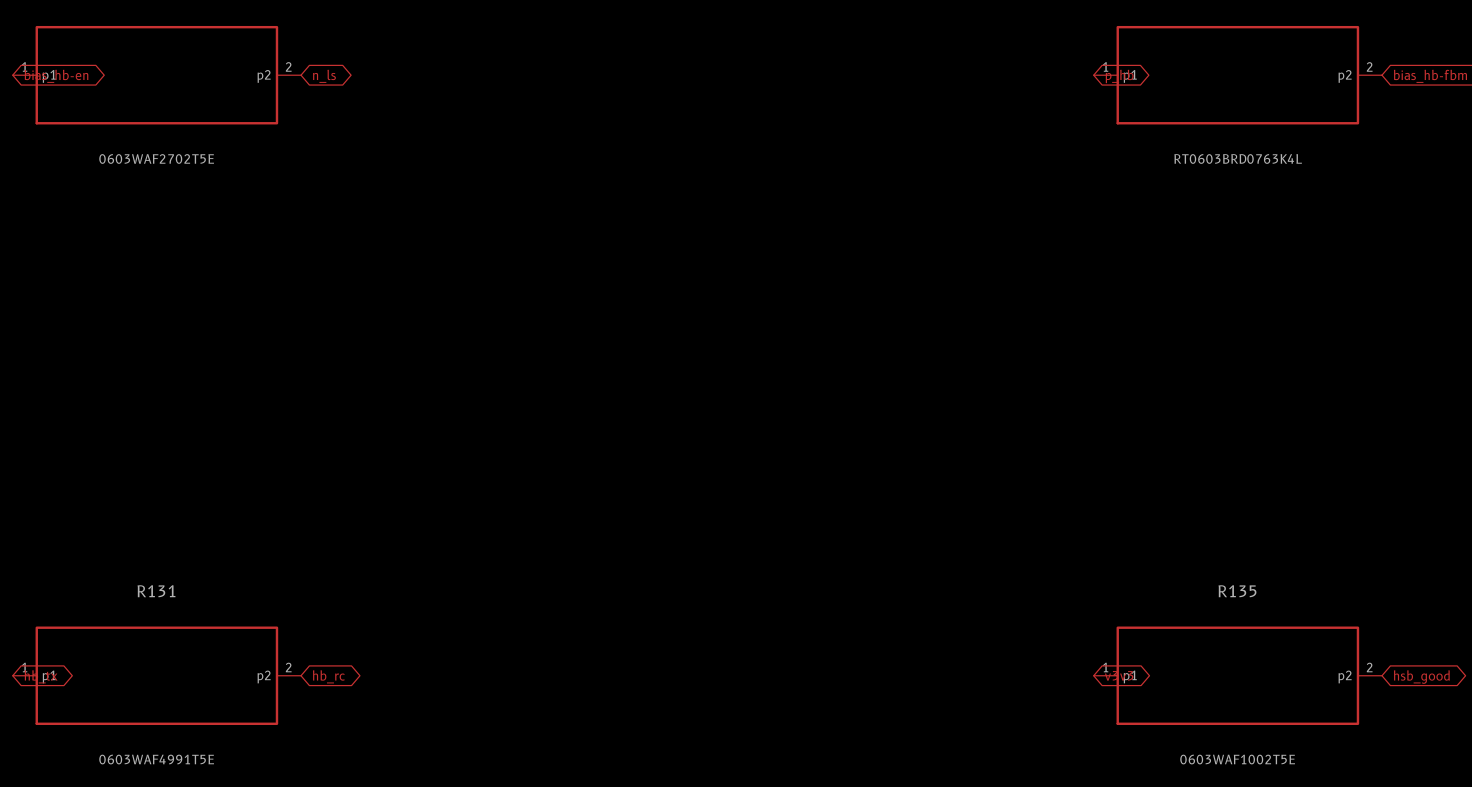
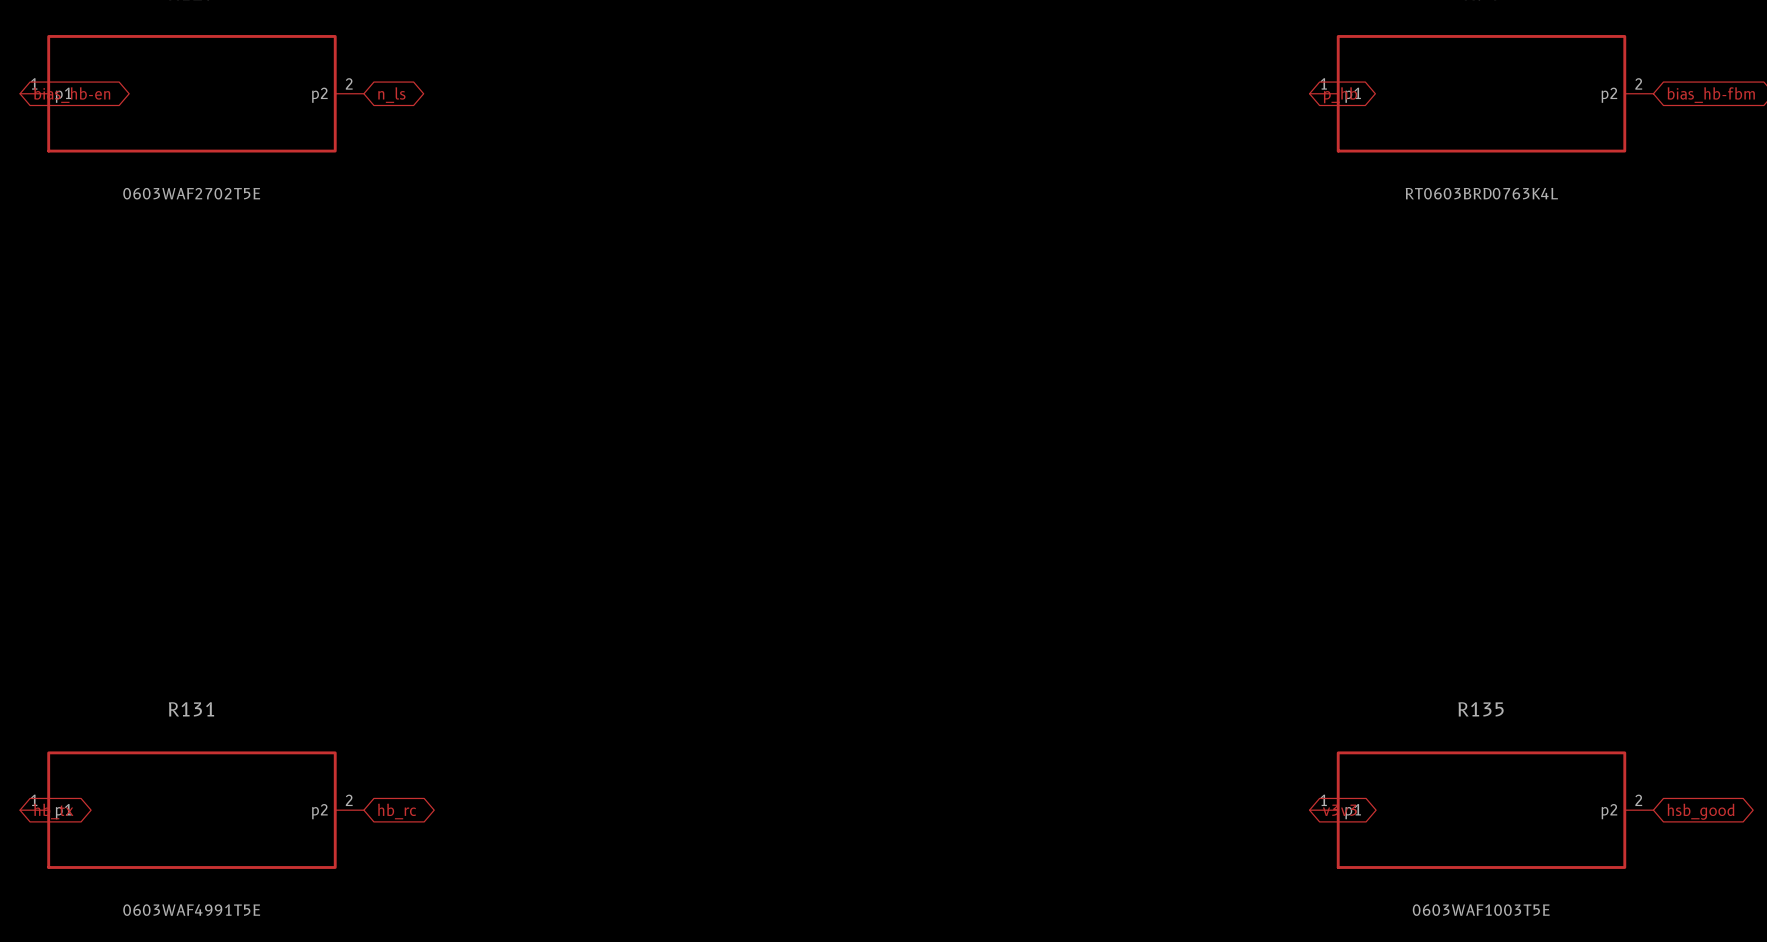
R135 value: 0603WAF1002T5E (1237, 759) -> 0603WAF1003T5E (1481, 910)

